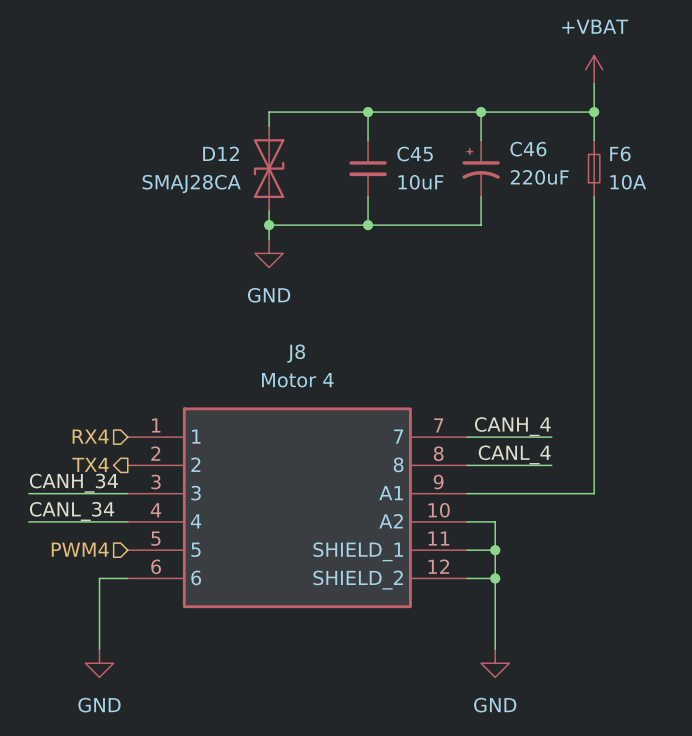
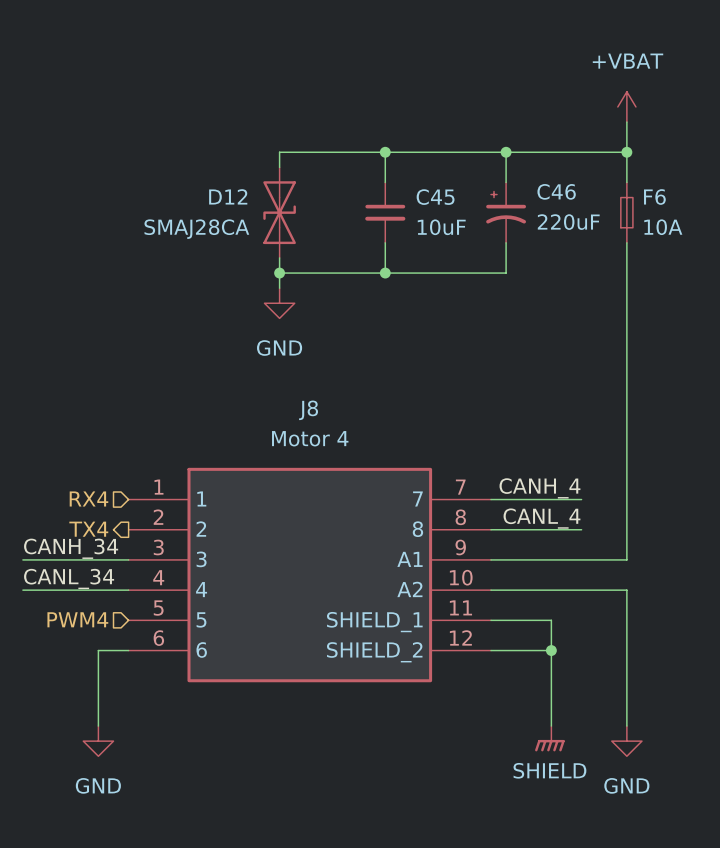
wire: (495, 521) (495, 649) -> (521, 590) (626, 590) (626, 726)
wire: none -> (521, 620) (551, 620) (551, 726)
junction: (495, 550) -> none
wire: none -> (521, 650) (551, 650)
junction: (495, 578) -> none
junction: none -> (551, 650)
power symbol: none -> SHIELD (549, 738)
power symbol position: GND (495, 663) -> GND (626, 741)

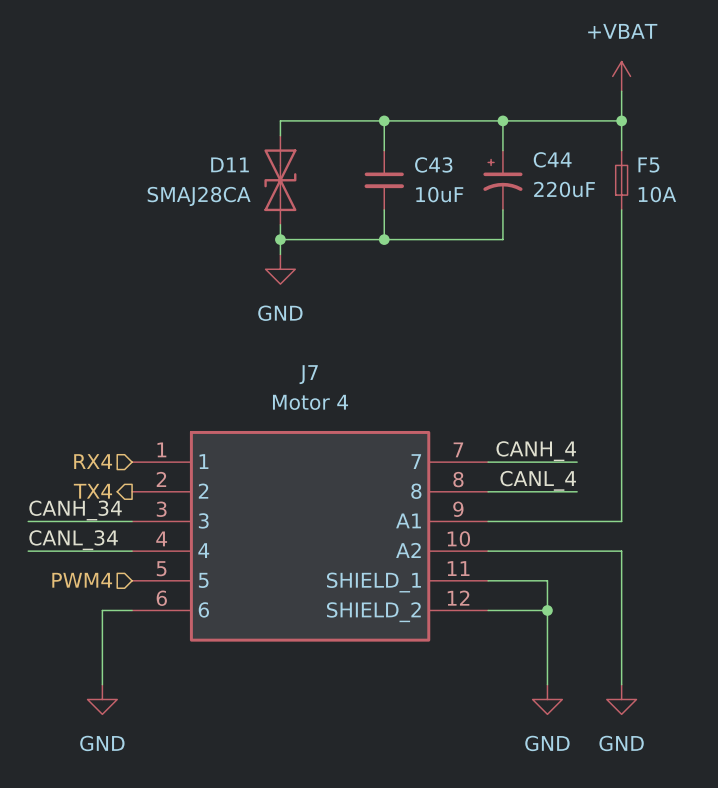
C46 name: C46 (556, 191) -> C44 (552, 159)
D12 name: D12 (228, 196) -> D11 (230, 164)
C45 name: C45 (435, 197) -> C43 (433, 164)
F6 name: F6 (654, 197) -> F5 (648, 165)
J8 name: J8 (308, 410) -> J7 (308, 374)
power symbol: SHIELD (549, 738) -> GND (547, 699)

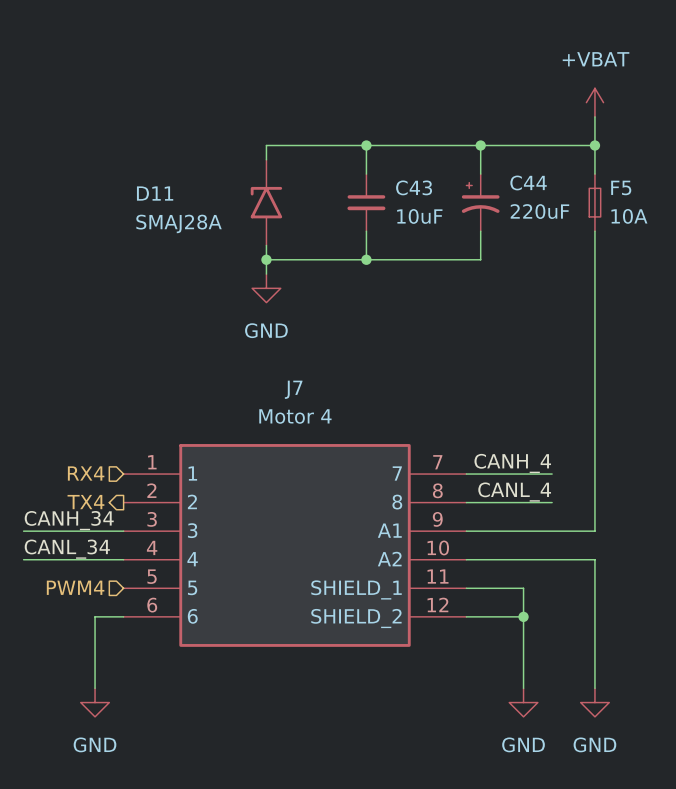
D11 symbol: [264, 135, 297, 225] -> [250, 159, 283, 246]
D11 name position: D11 (230, 164) -> D11 (155, 193)
D11 value: SMAJ28CA (199, 196) -> SMAJ28A (179, 223)

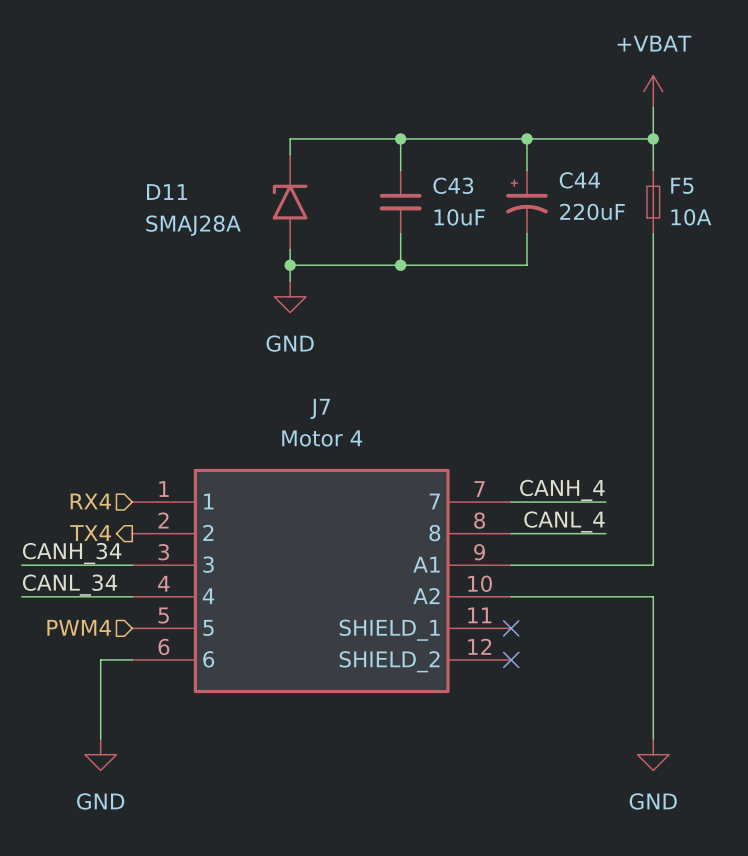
wire: (466, 588) (523, 588) (523, 688) -> none
no-connect mark: none -> (511, 628)
wire: (466, 616) (523, 616) -> none
no-connect mark: none -> (511, 659)
junction: (523, 616) -> none
power symbol: GND (523, 702) -> none

